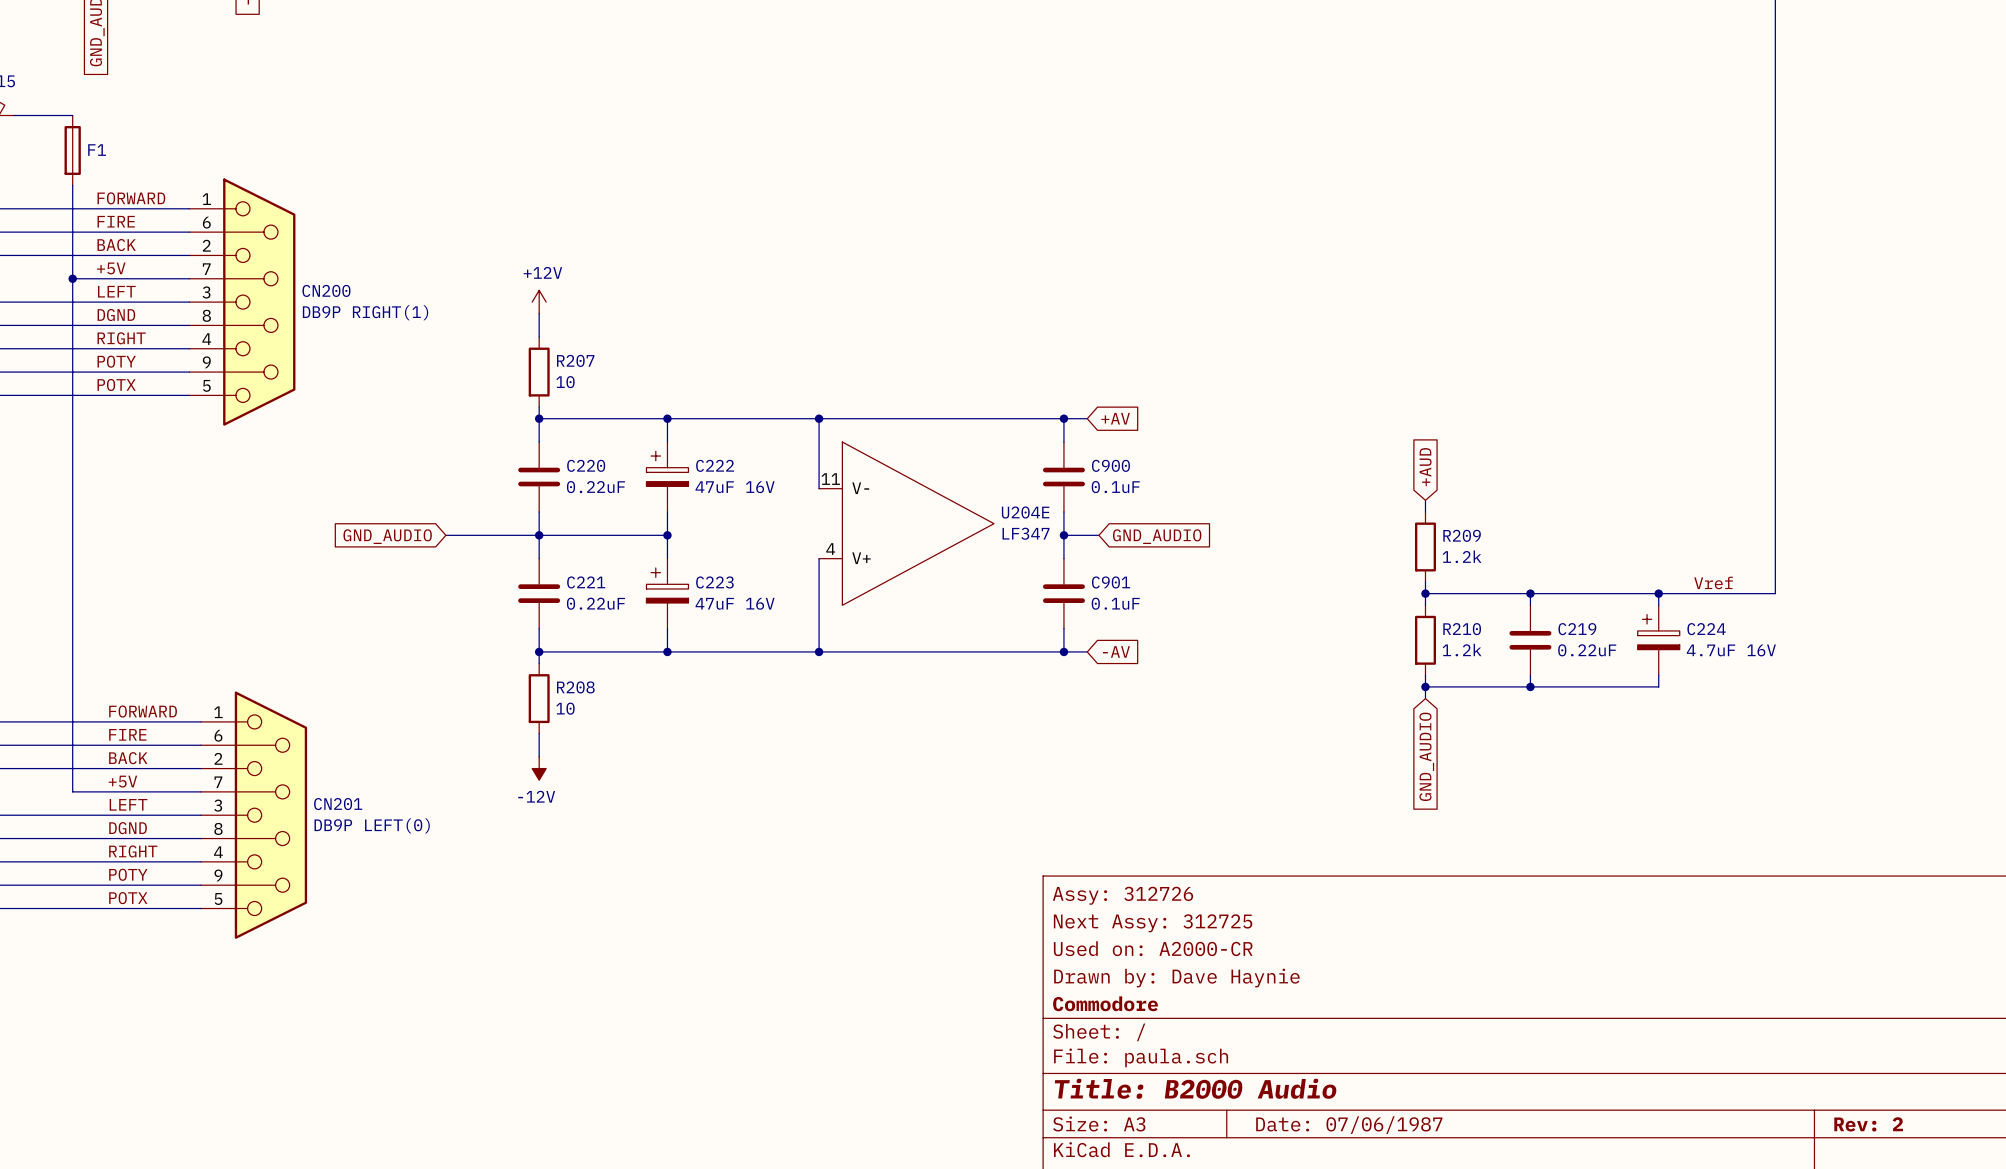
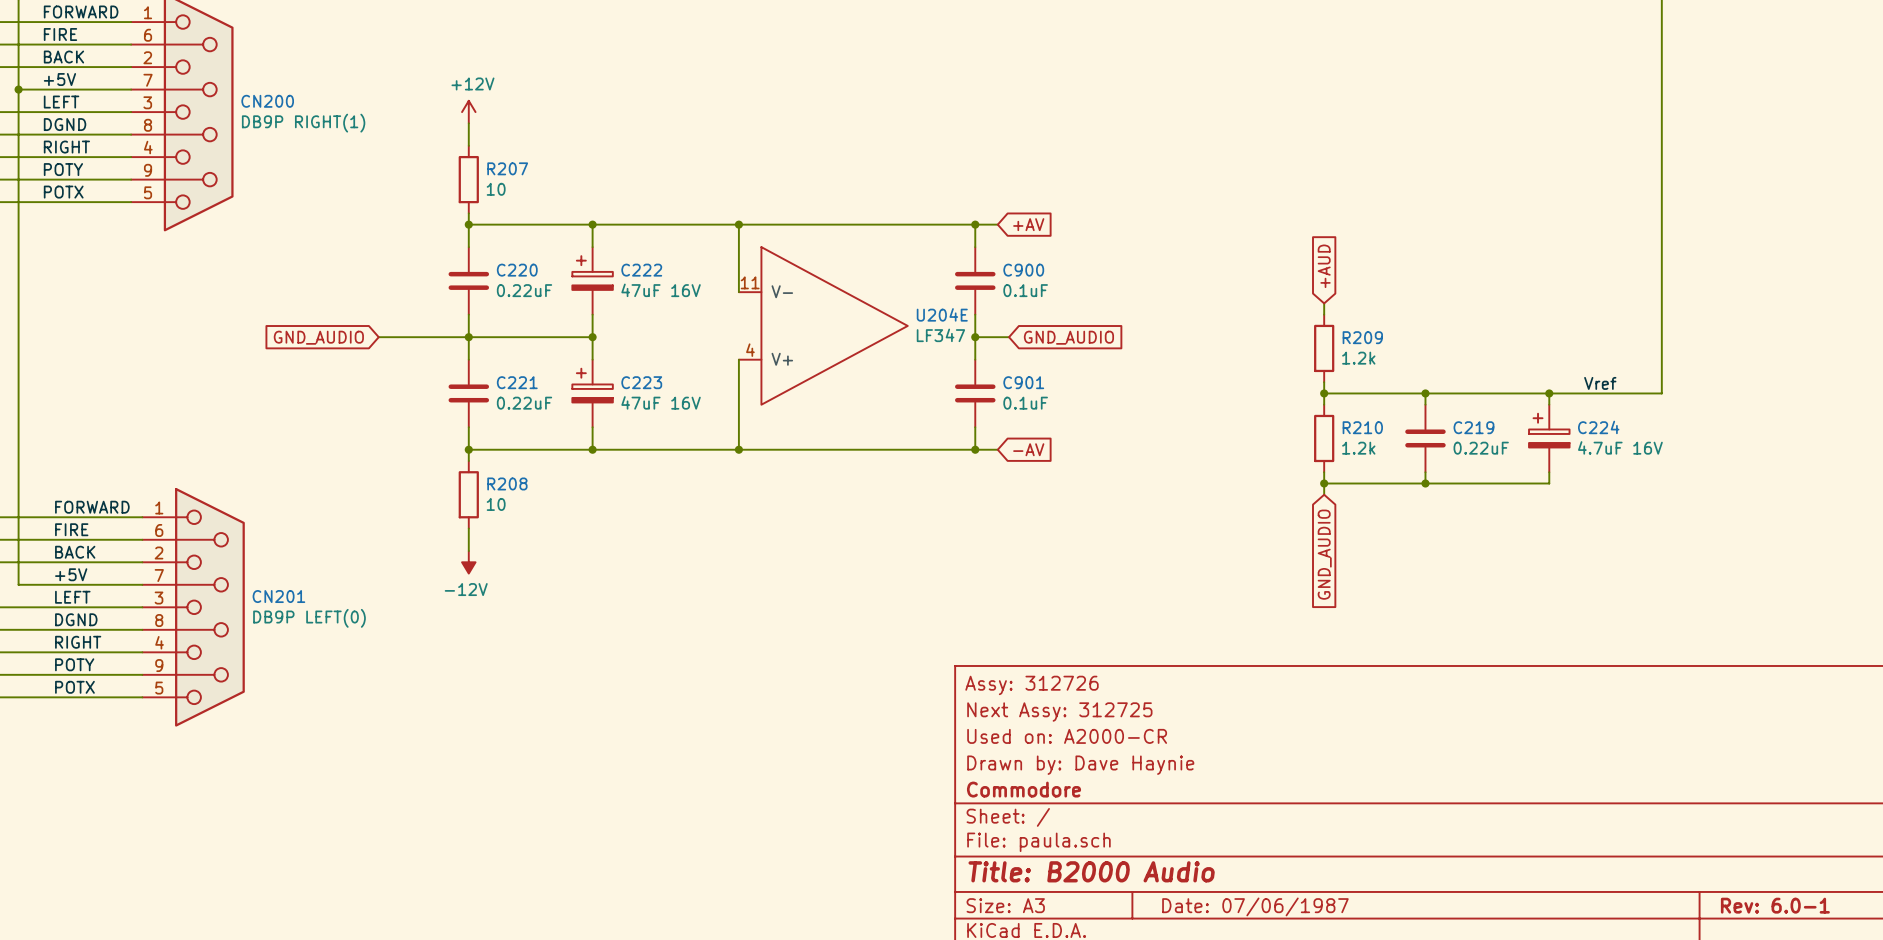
title block: Rev: 2 (1868, 1124) -> Rev: 6.0-1 (1775, 905)

